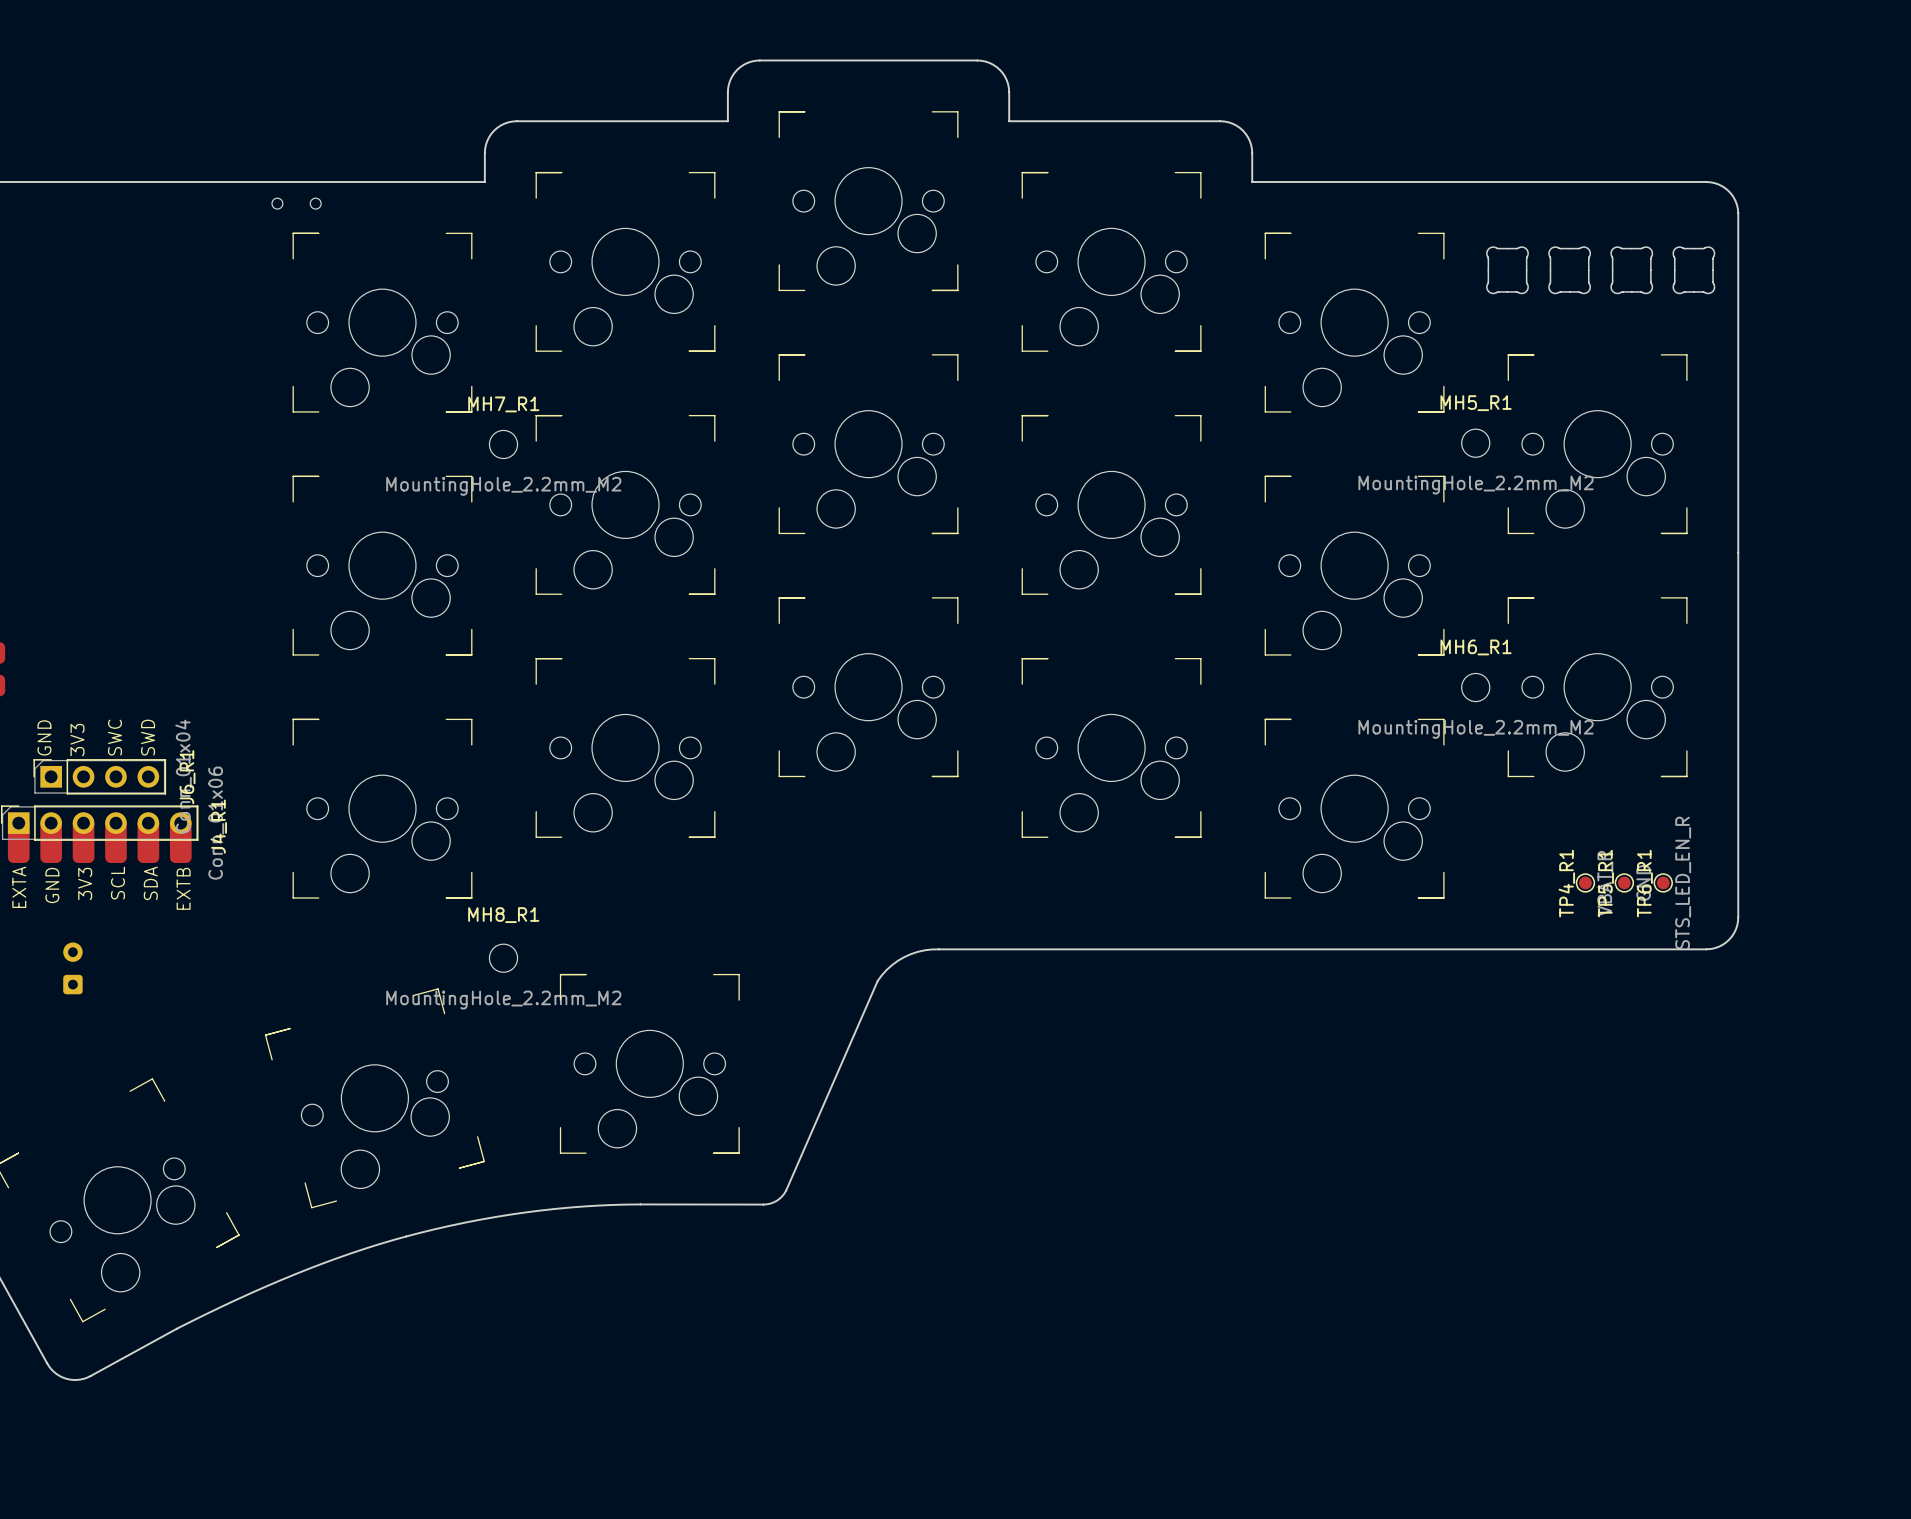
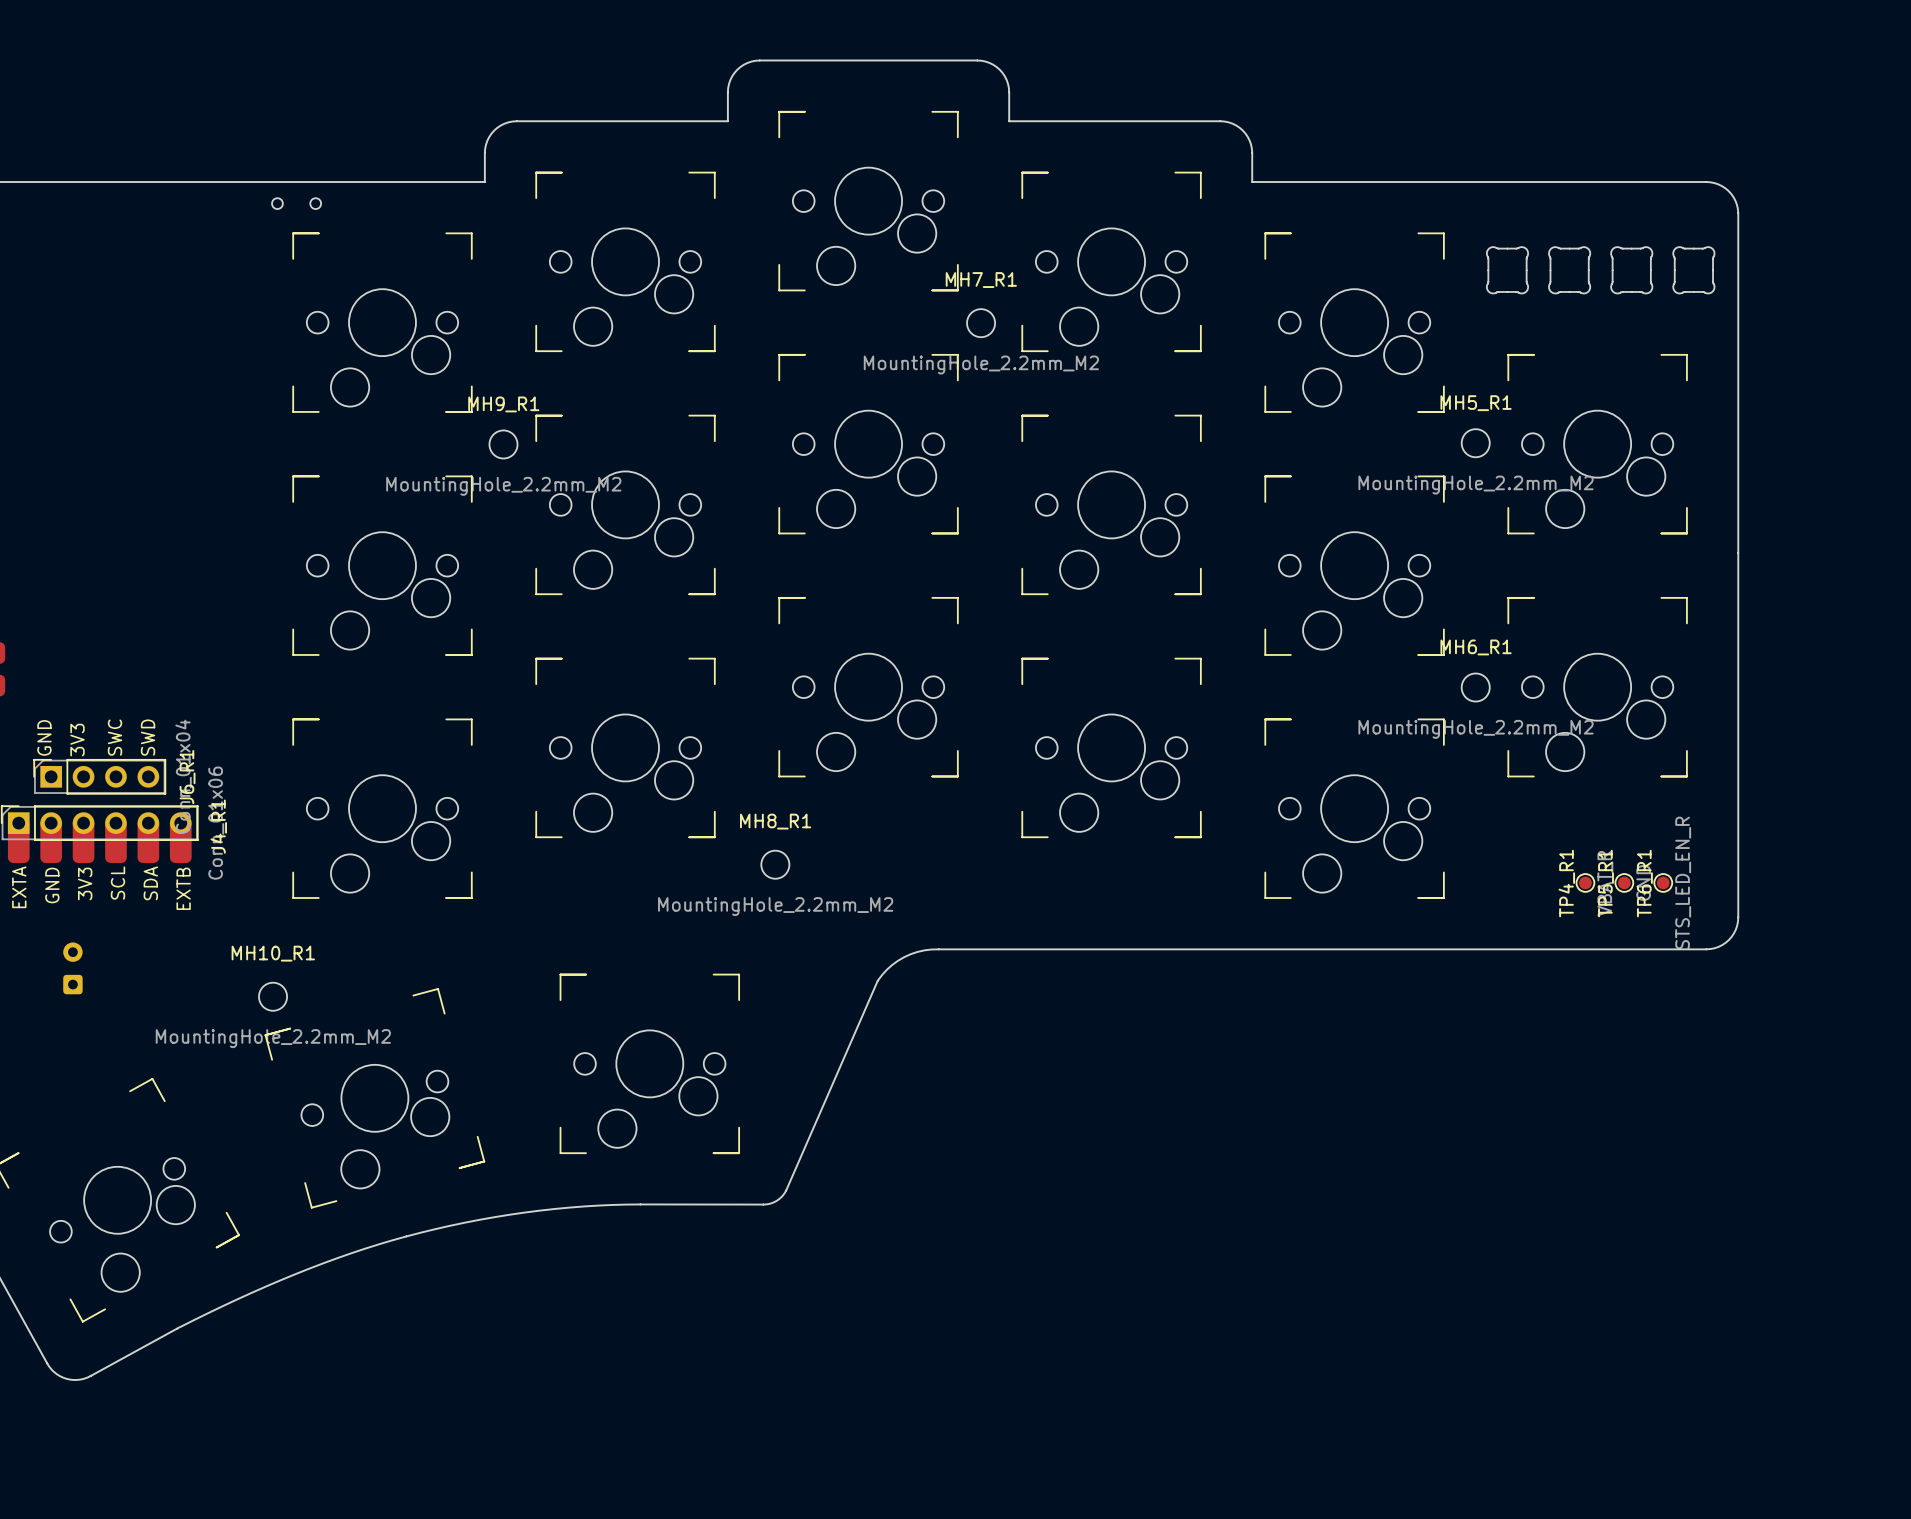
MH7_R1: none -> MountingHole_2.2mm_M2 (981, 323)
MH7_R1 name: MH7_R1 (503, 404) -> MH9_R1 (503, 404)
MH8_R1 position: (503, 958) -> (775, 864)
MH10_R1: none -> MountingHole_2.2mm_M2 (273, 996)

